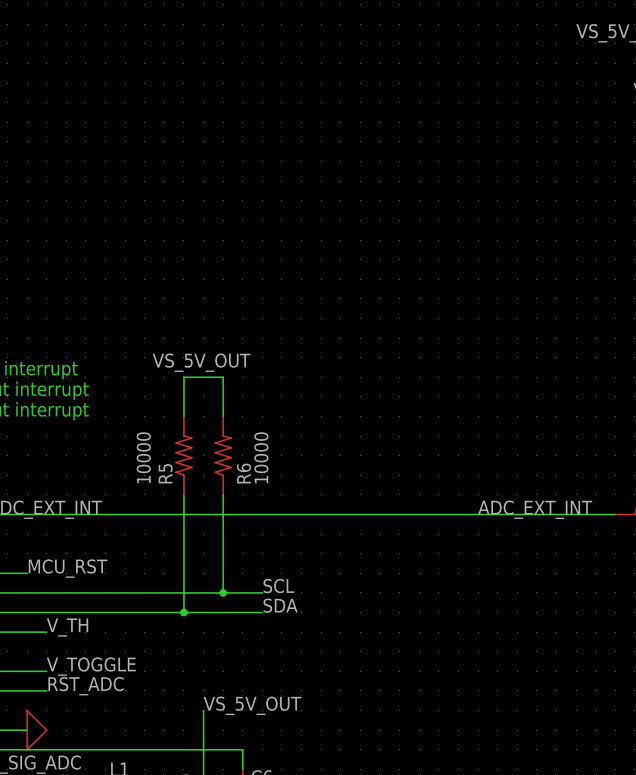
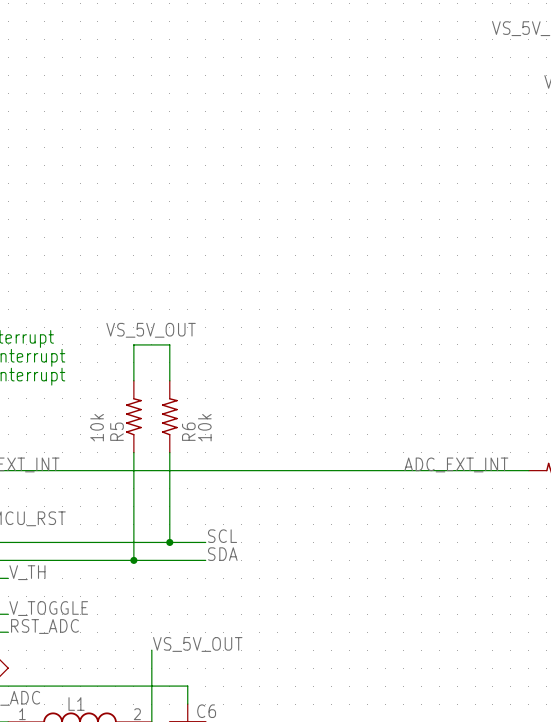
R5 value: 10000 (143, 457) -> 10k (97, 427)
R6 value: 10000 (261, 457) -> 10k (204, 427)

